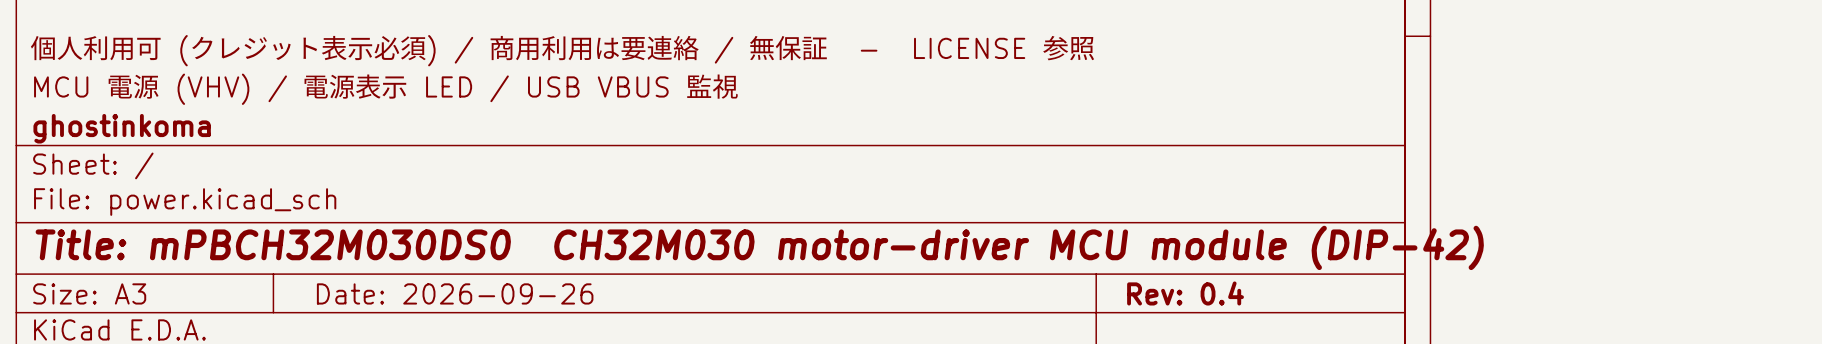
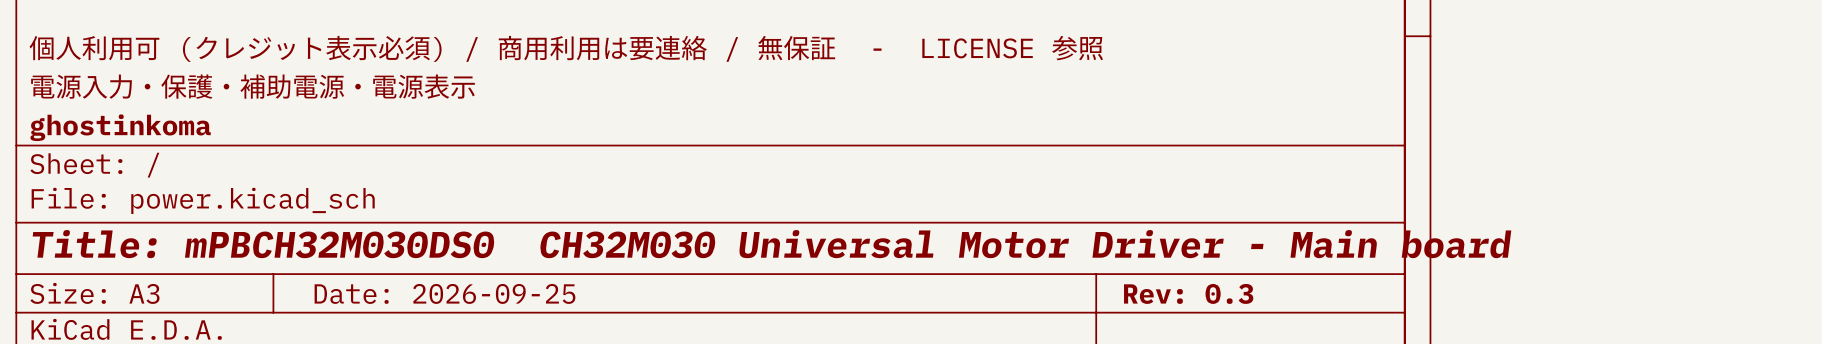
title block: MCU 電源 (VHV) / 電源表示 LED / USB VBUS 監視 (386, 89) -> 電源入力・保護・補助電源・電源表示 (253, 86)
title block: Title: mPBCH32M030DS0 CH32M030 motor-driver MCU module (DIP-42) (759, 247) -> Title: mPBCH32M030DS0 CH32M030 Universal Motor Driver - Main board (771, 244)
title block: Date: 2026-09-26 (455, 293) -> Date: 2026-09-25 (444, 293)
title block: Rev: 0.4 (1185, 293) -> Rev: 0.3 (1188, 293)

